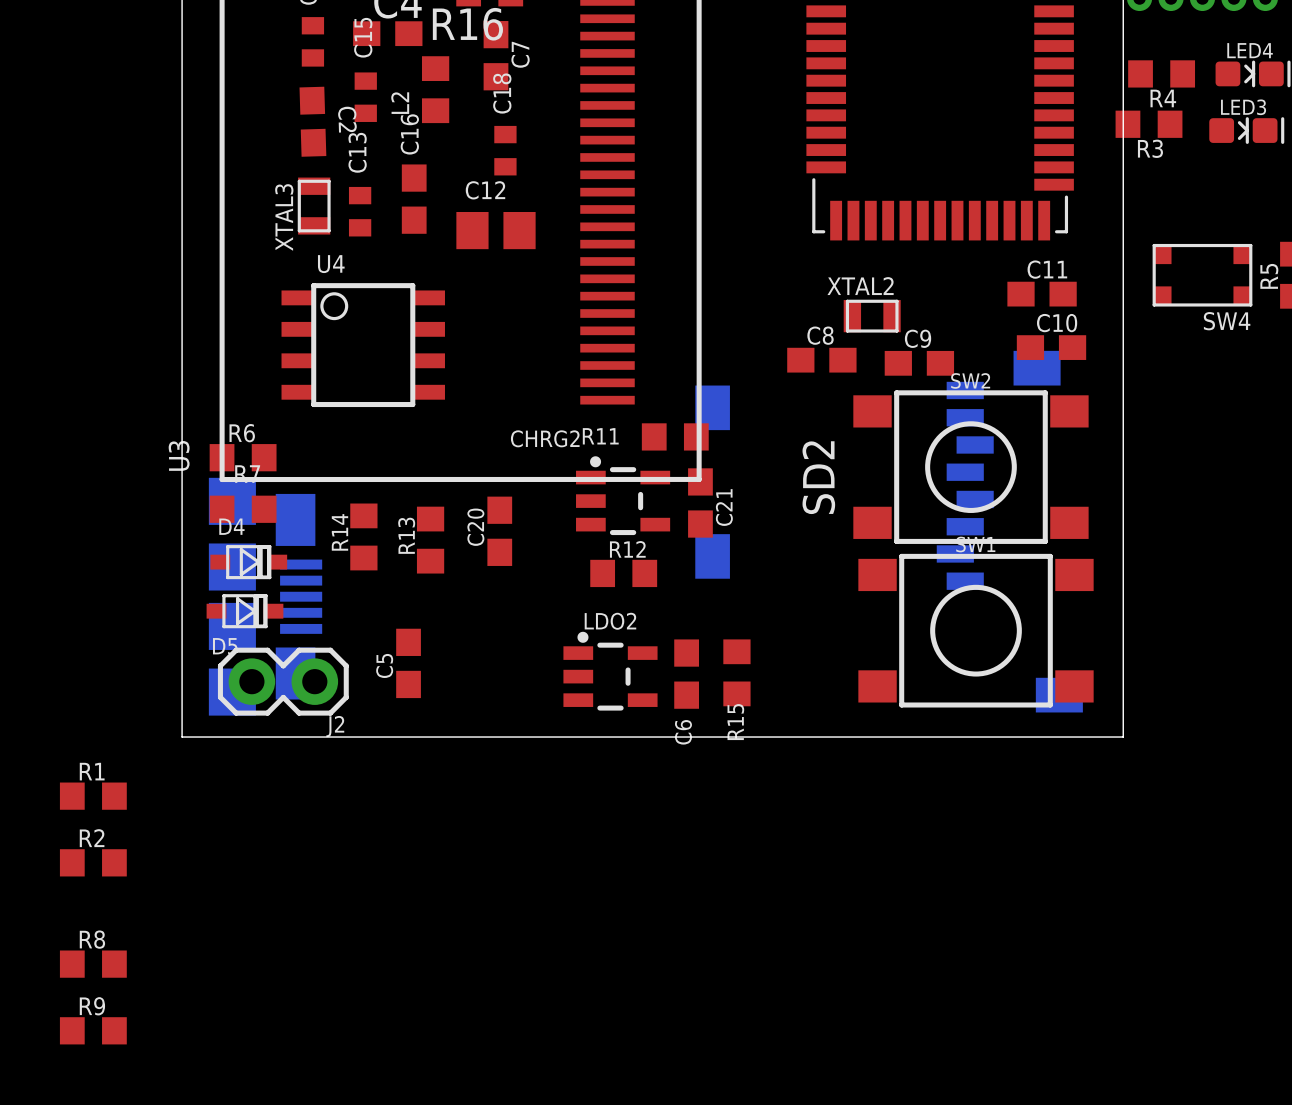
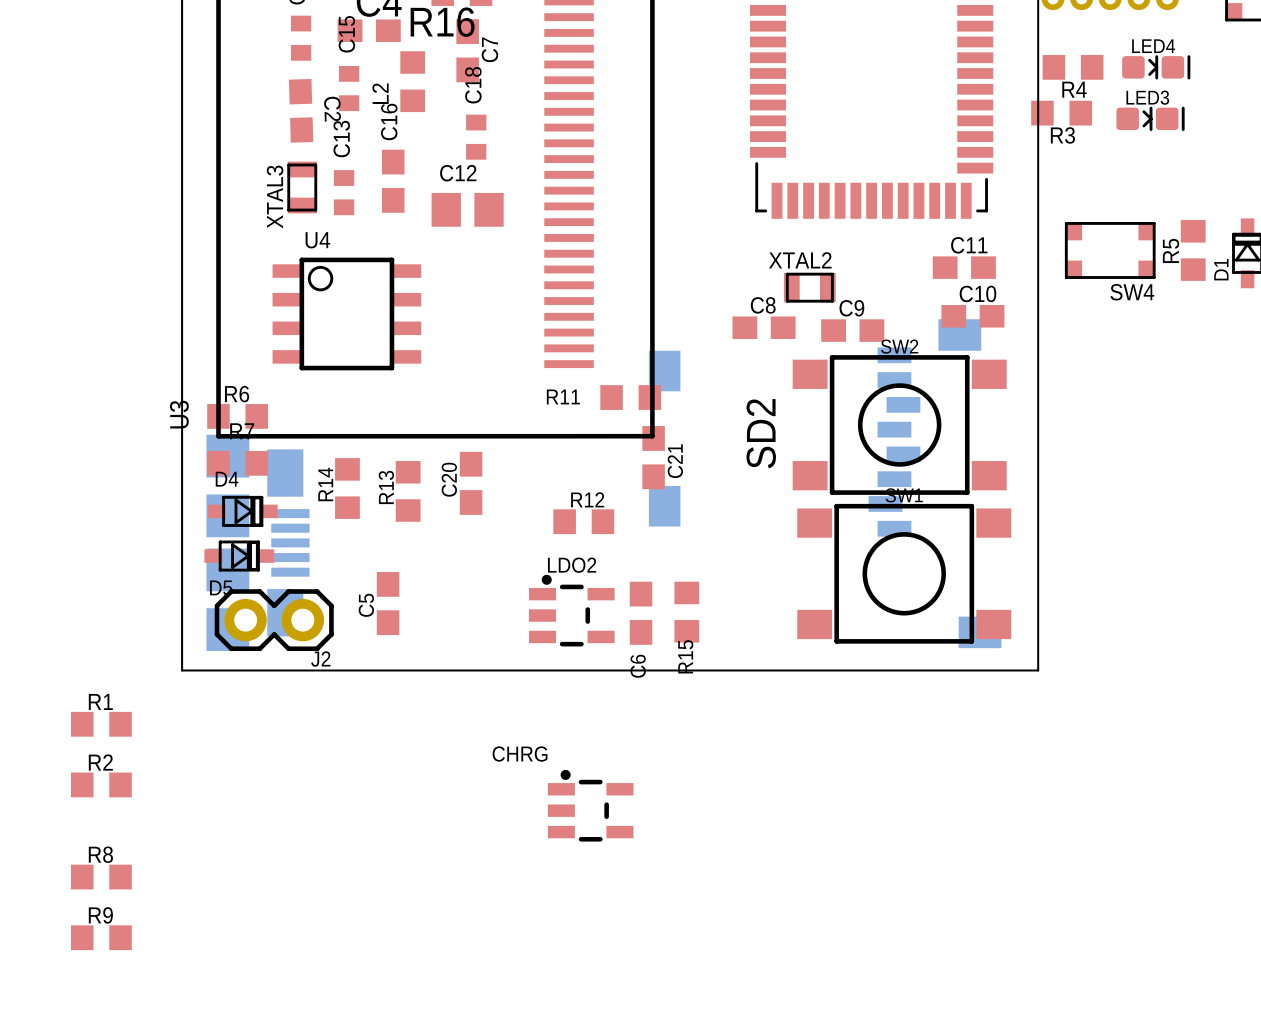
CHRG2: (623, 495) -> none
CHRG: none -> (590, 805)

